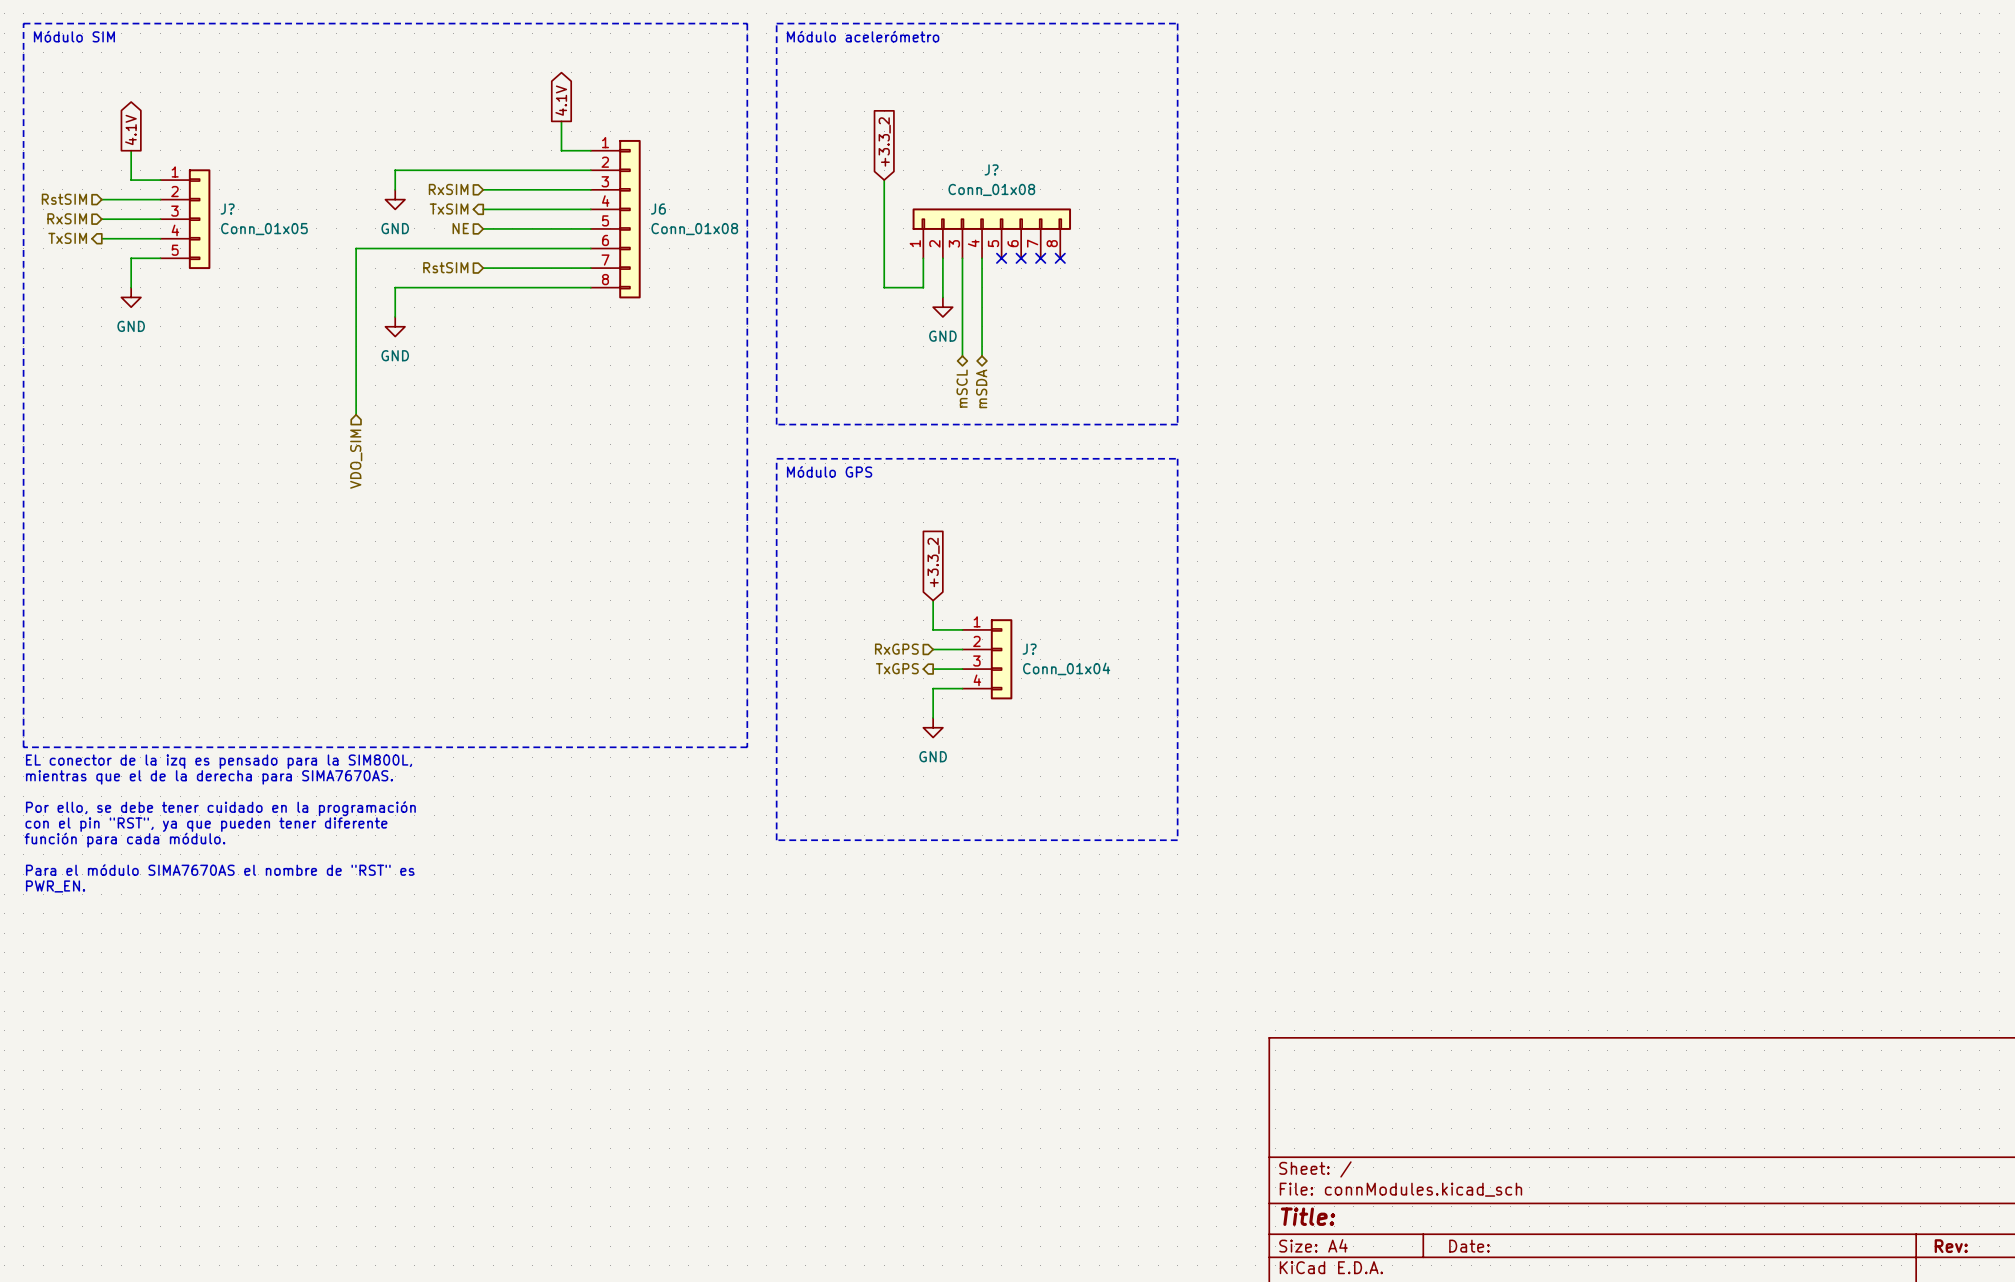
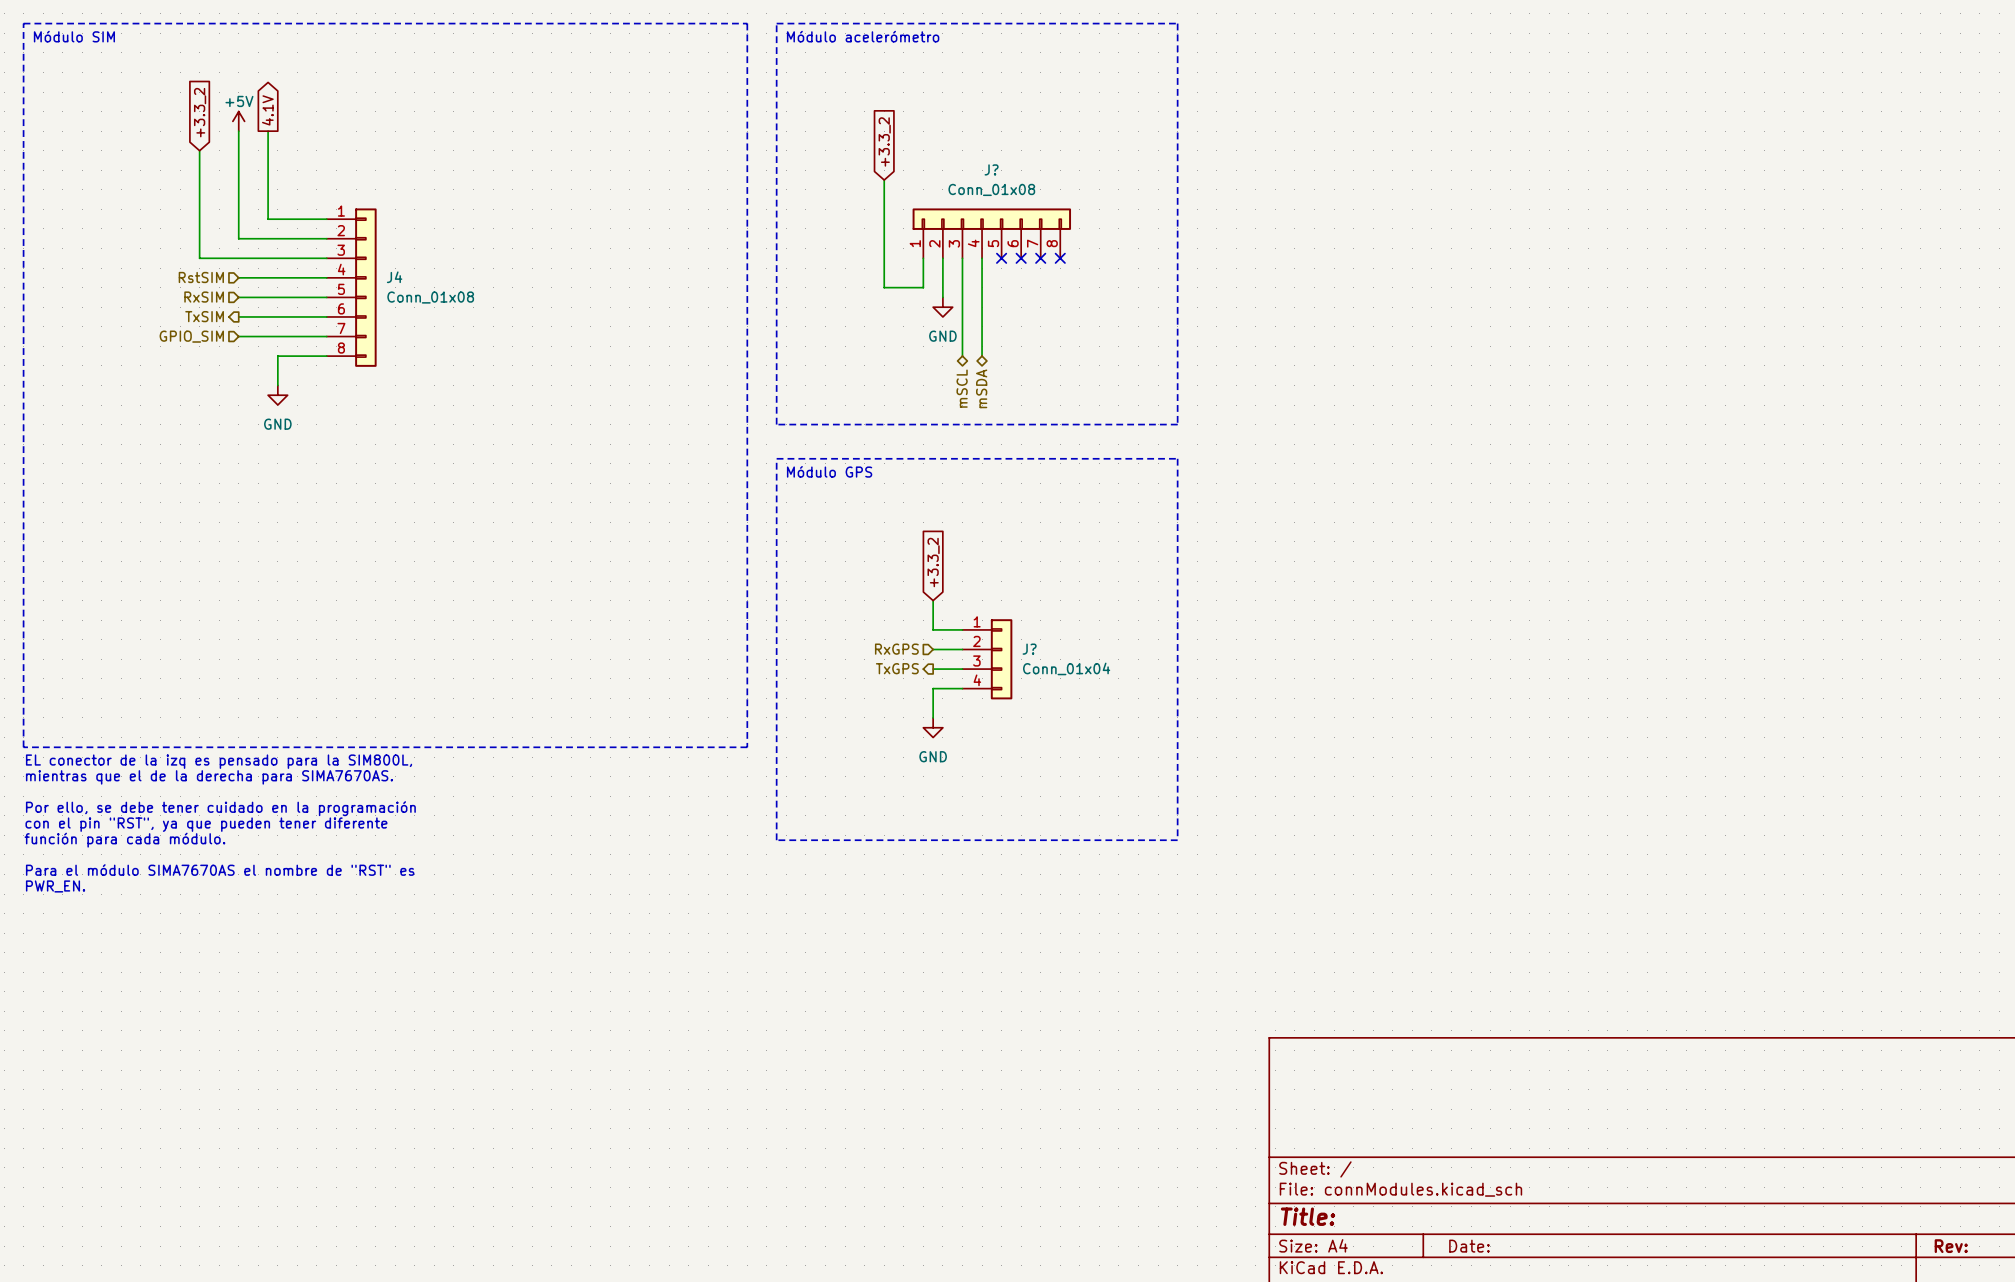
global label: 4.1V (561, 100) -> none
global label: none -> +3.3_2 (200, 112)
power symbol: none -> +5V (238, 121)
wire: (561, 121) (561, 150) (590, 150) -> none
global label position: 4.1V (130, 129) -> 4.1V (267, 110)
wire: none -> (238, 131) (238, 238) (326, 238)
wire: none -> (268, 131) (268, 219) (326, 219)
wire: (131, 150) (131, 180) (160, 180) -> none
wire: none -> (199, 150) (199, 258) (326, 258)
wire: (590, 170) (395, 170) (395, 189) -> none
hierarchical label: RxSIM (448, 189) -> none
wire: (483, 189) (590, 189) -> none
hierarchical label: RstSIM (64, 199) -> none
wire: (101, 199) (160, 199) -> none
power symbol: GND (395, 199) -> none
hierarchical label: TxSIM (449, 209) -> none
wire: (483, 209) (590, 209) -> none
hierarchical label: RxSIM (67, 218) -> none
wire: (101, 219) (160, 219) -> none
J?: Conn_01x05 (185, 219) -> none
J6: Conn_01x08 (615, 219) -> none
hierarchical label: NE (460, 228) -> none
wire: (483, 228) (590, 228) -> none
hierarchical label: TxSIM (67, 238) -> none
wire: (101, 238) (160, 238) -> none
wire: (590, 248) (356, 248) (356, 414) -> none
wire: (160, 258) (131, 258) (131, 287) -> none
hierarchical label: RstSIM (445, 267) -> none
wire: (483, 268) (590, 268) -> none
hierarchical label: none -> RstSIM (201, 277)
wire: none -> (238, 277) (326, 277)
J4: none -> Conn_01x08 (351, 287)
wire: (590, 287) (395, 287) (395, 316) -> none
power symbol: GND (131, 297) -> none
hierarchical label: none -> RxSIM (204, 297)
wire: none -> (238, 297) (326, 297)
hierarchical label: none -> TxSIM (204, 316)
wire: none -> (238, 316) (326, 316)
power symbol: GND (395, 326) -> none
hierarchical label: none -> GPIO_SIM (191, 336)
wire: none -> (238, 336) (326, 336)
wire: none -> (326, 356) (277, 356) (277, 385)
power symbol: none -> GND (277, 395)
hierarchical label: VDO_SIM (356, 459) -> none

